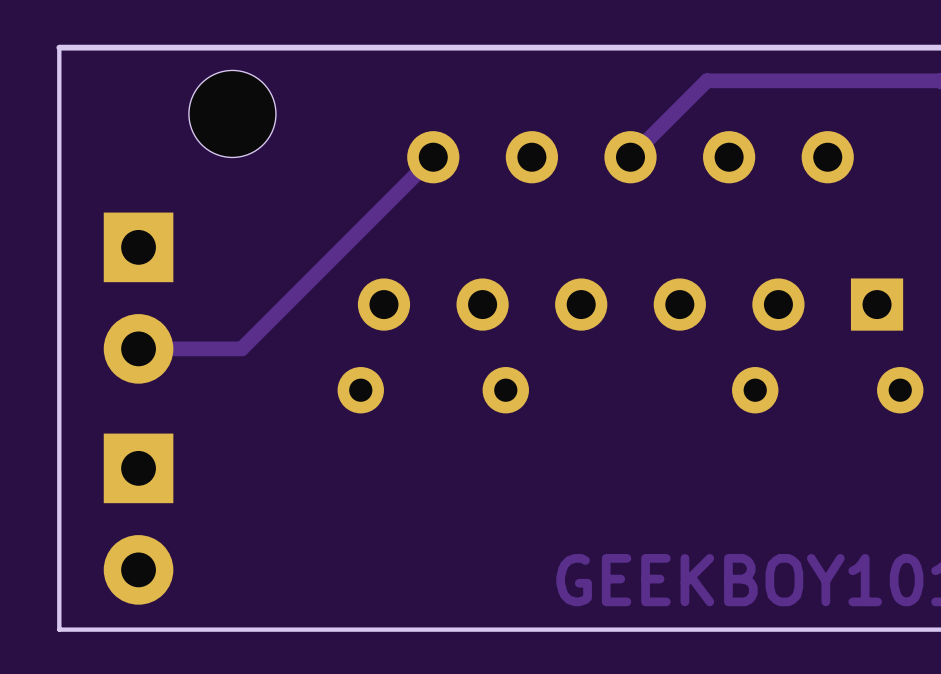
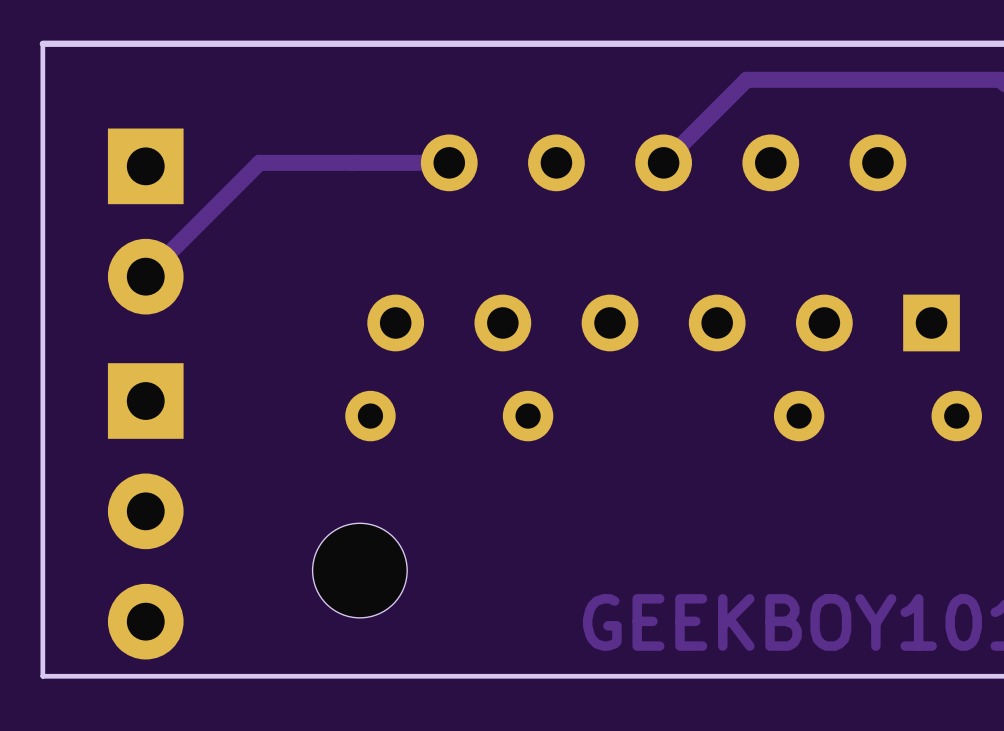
part position: (232, 113) -> (359, 570)
track: (433, 157) (241, 348) (138, 348) -> (449, 162) (259, 162) (145, 276)
part position: (138, 298) -> (145, 221)
part: none -> (145, 511)
part: (138, 519) -> none

